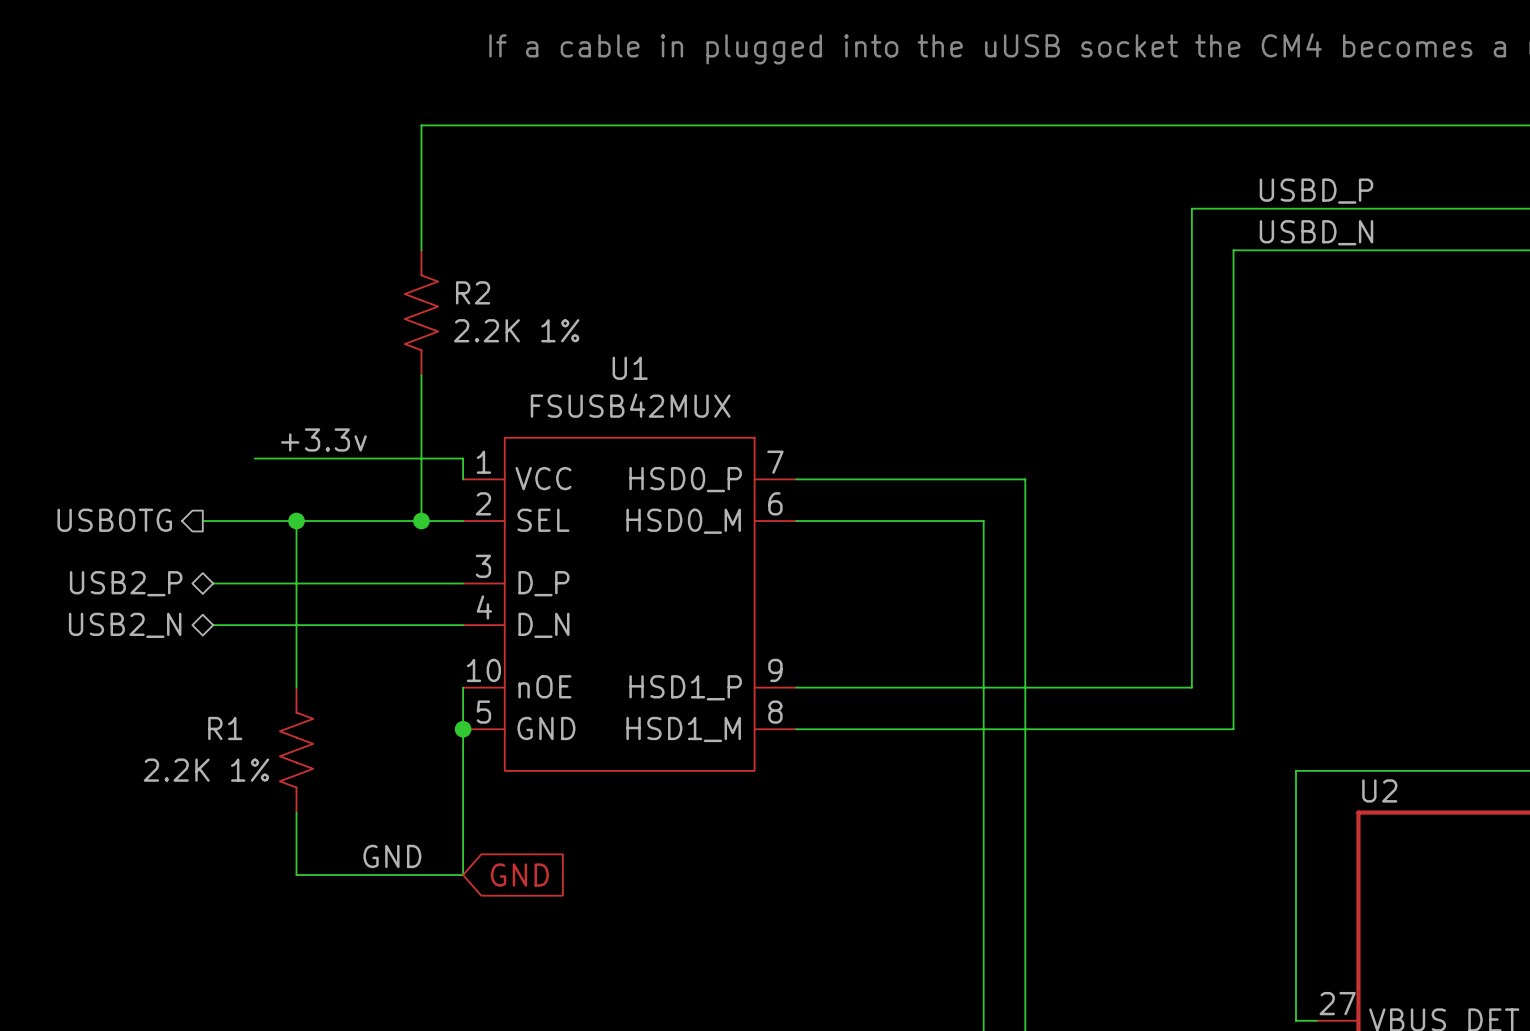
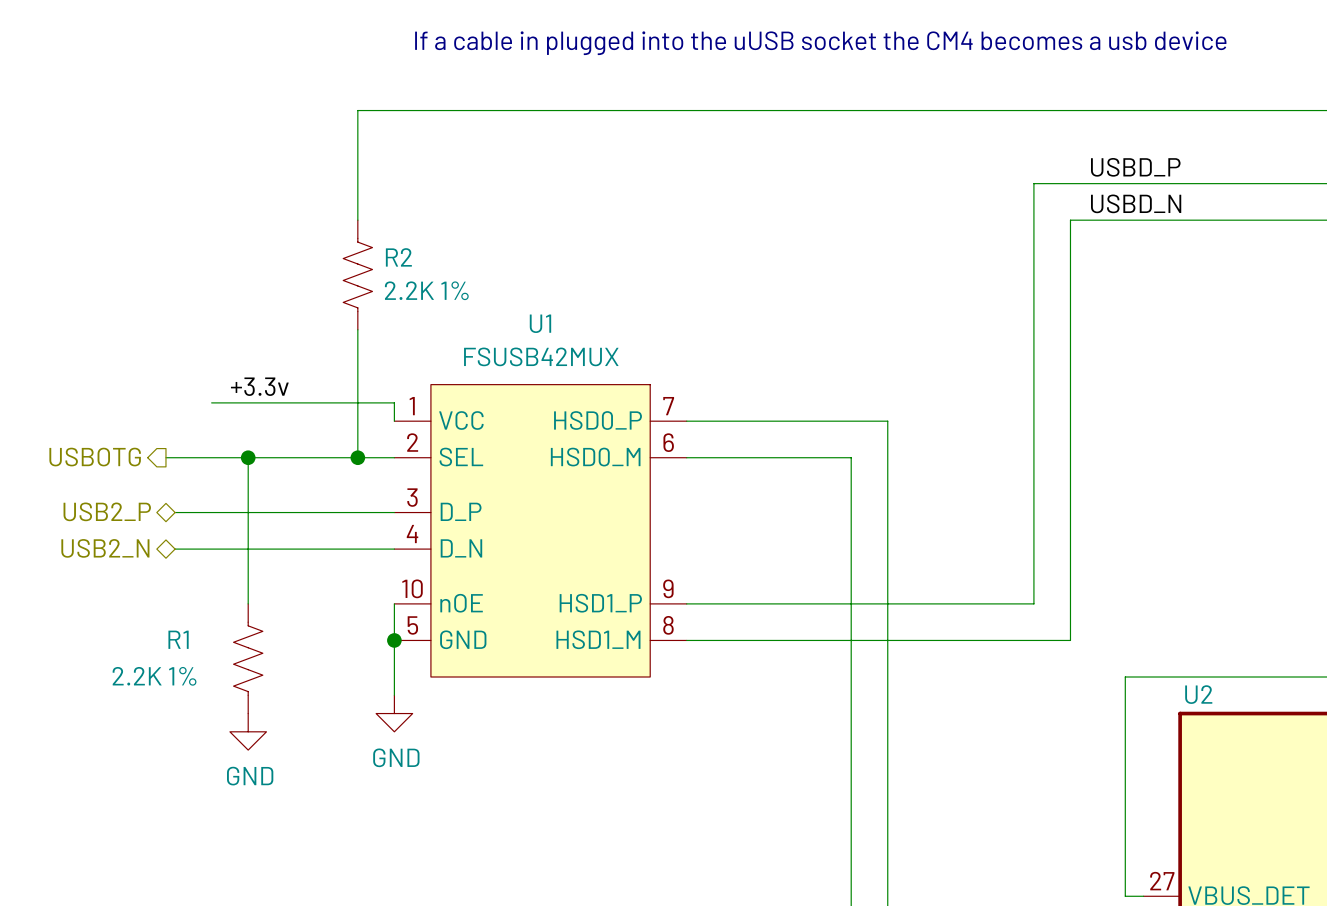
wire: (463, 791) (463, 875) (296, 875) (296, 812) -> none
power symbol: none -> GND (394, 713)
power symbol: none -> GND (248, 731)
label: GND (392, 856) -> none
global label: GND (519, 875) -> none

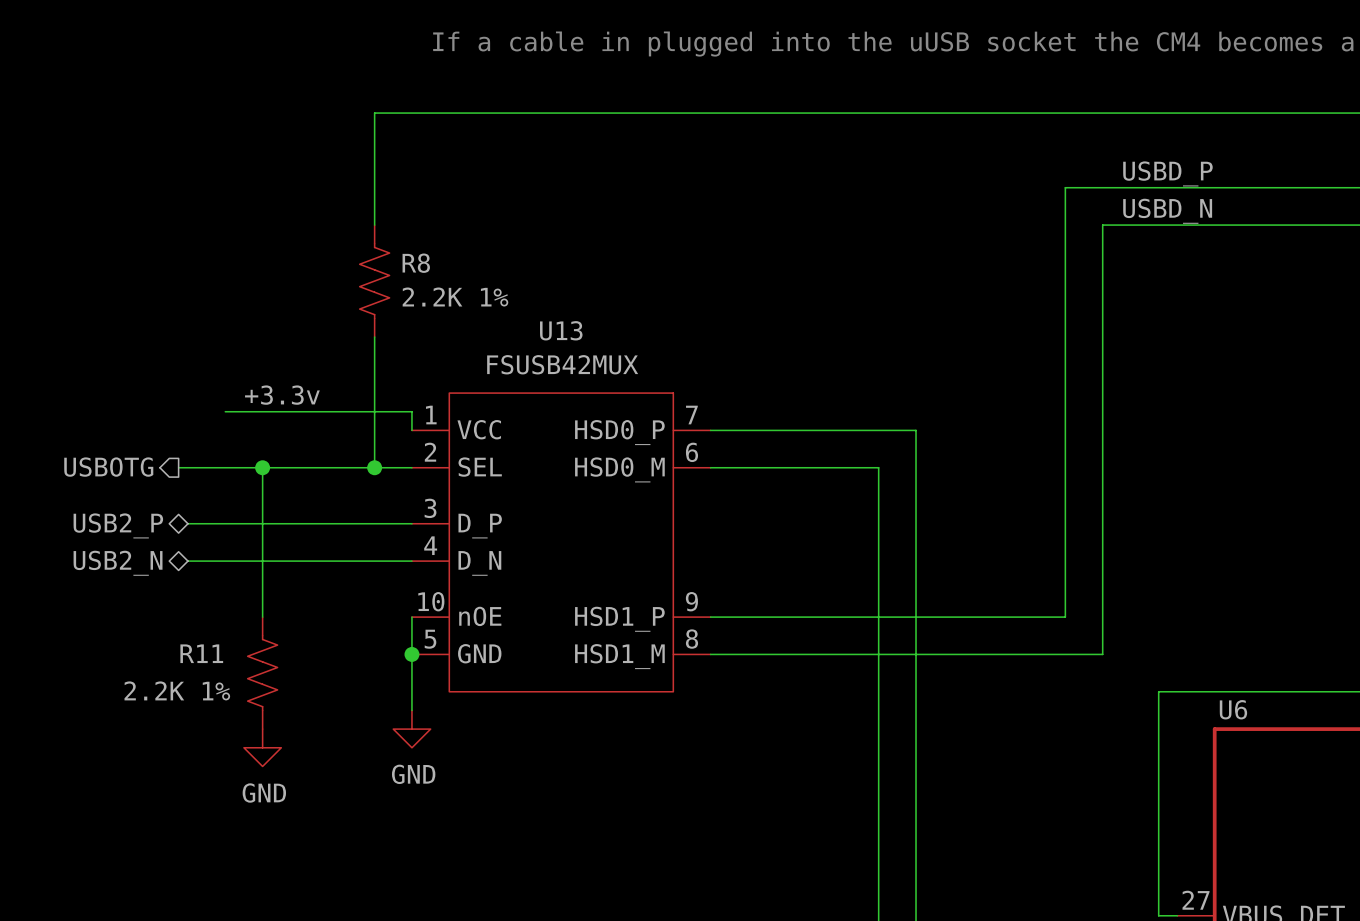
R2 name: R2 (398, 257) -> R8 (416, 263)
U1 name: U1 (540, 323) -> U13 (561, 330)
R1 name: R1 (178, 639) -> R11 (201, 653)
U2 name: U2 (1198, 694) -> U6 (1233, 709)

